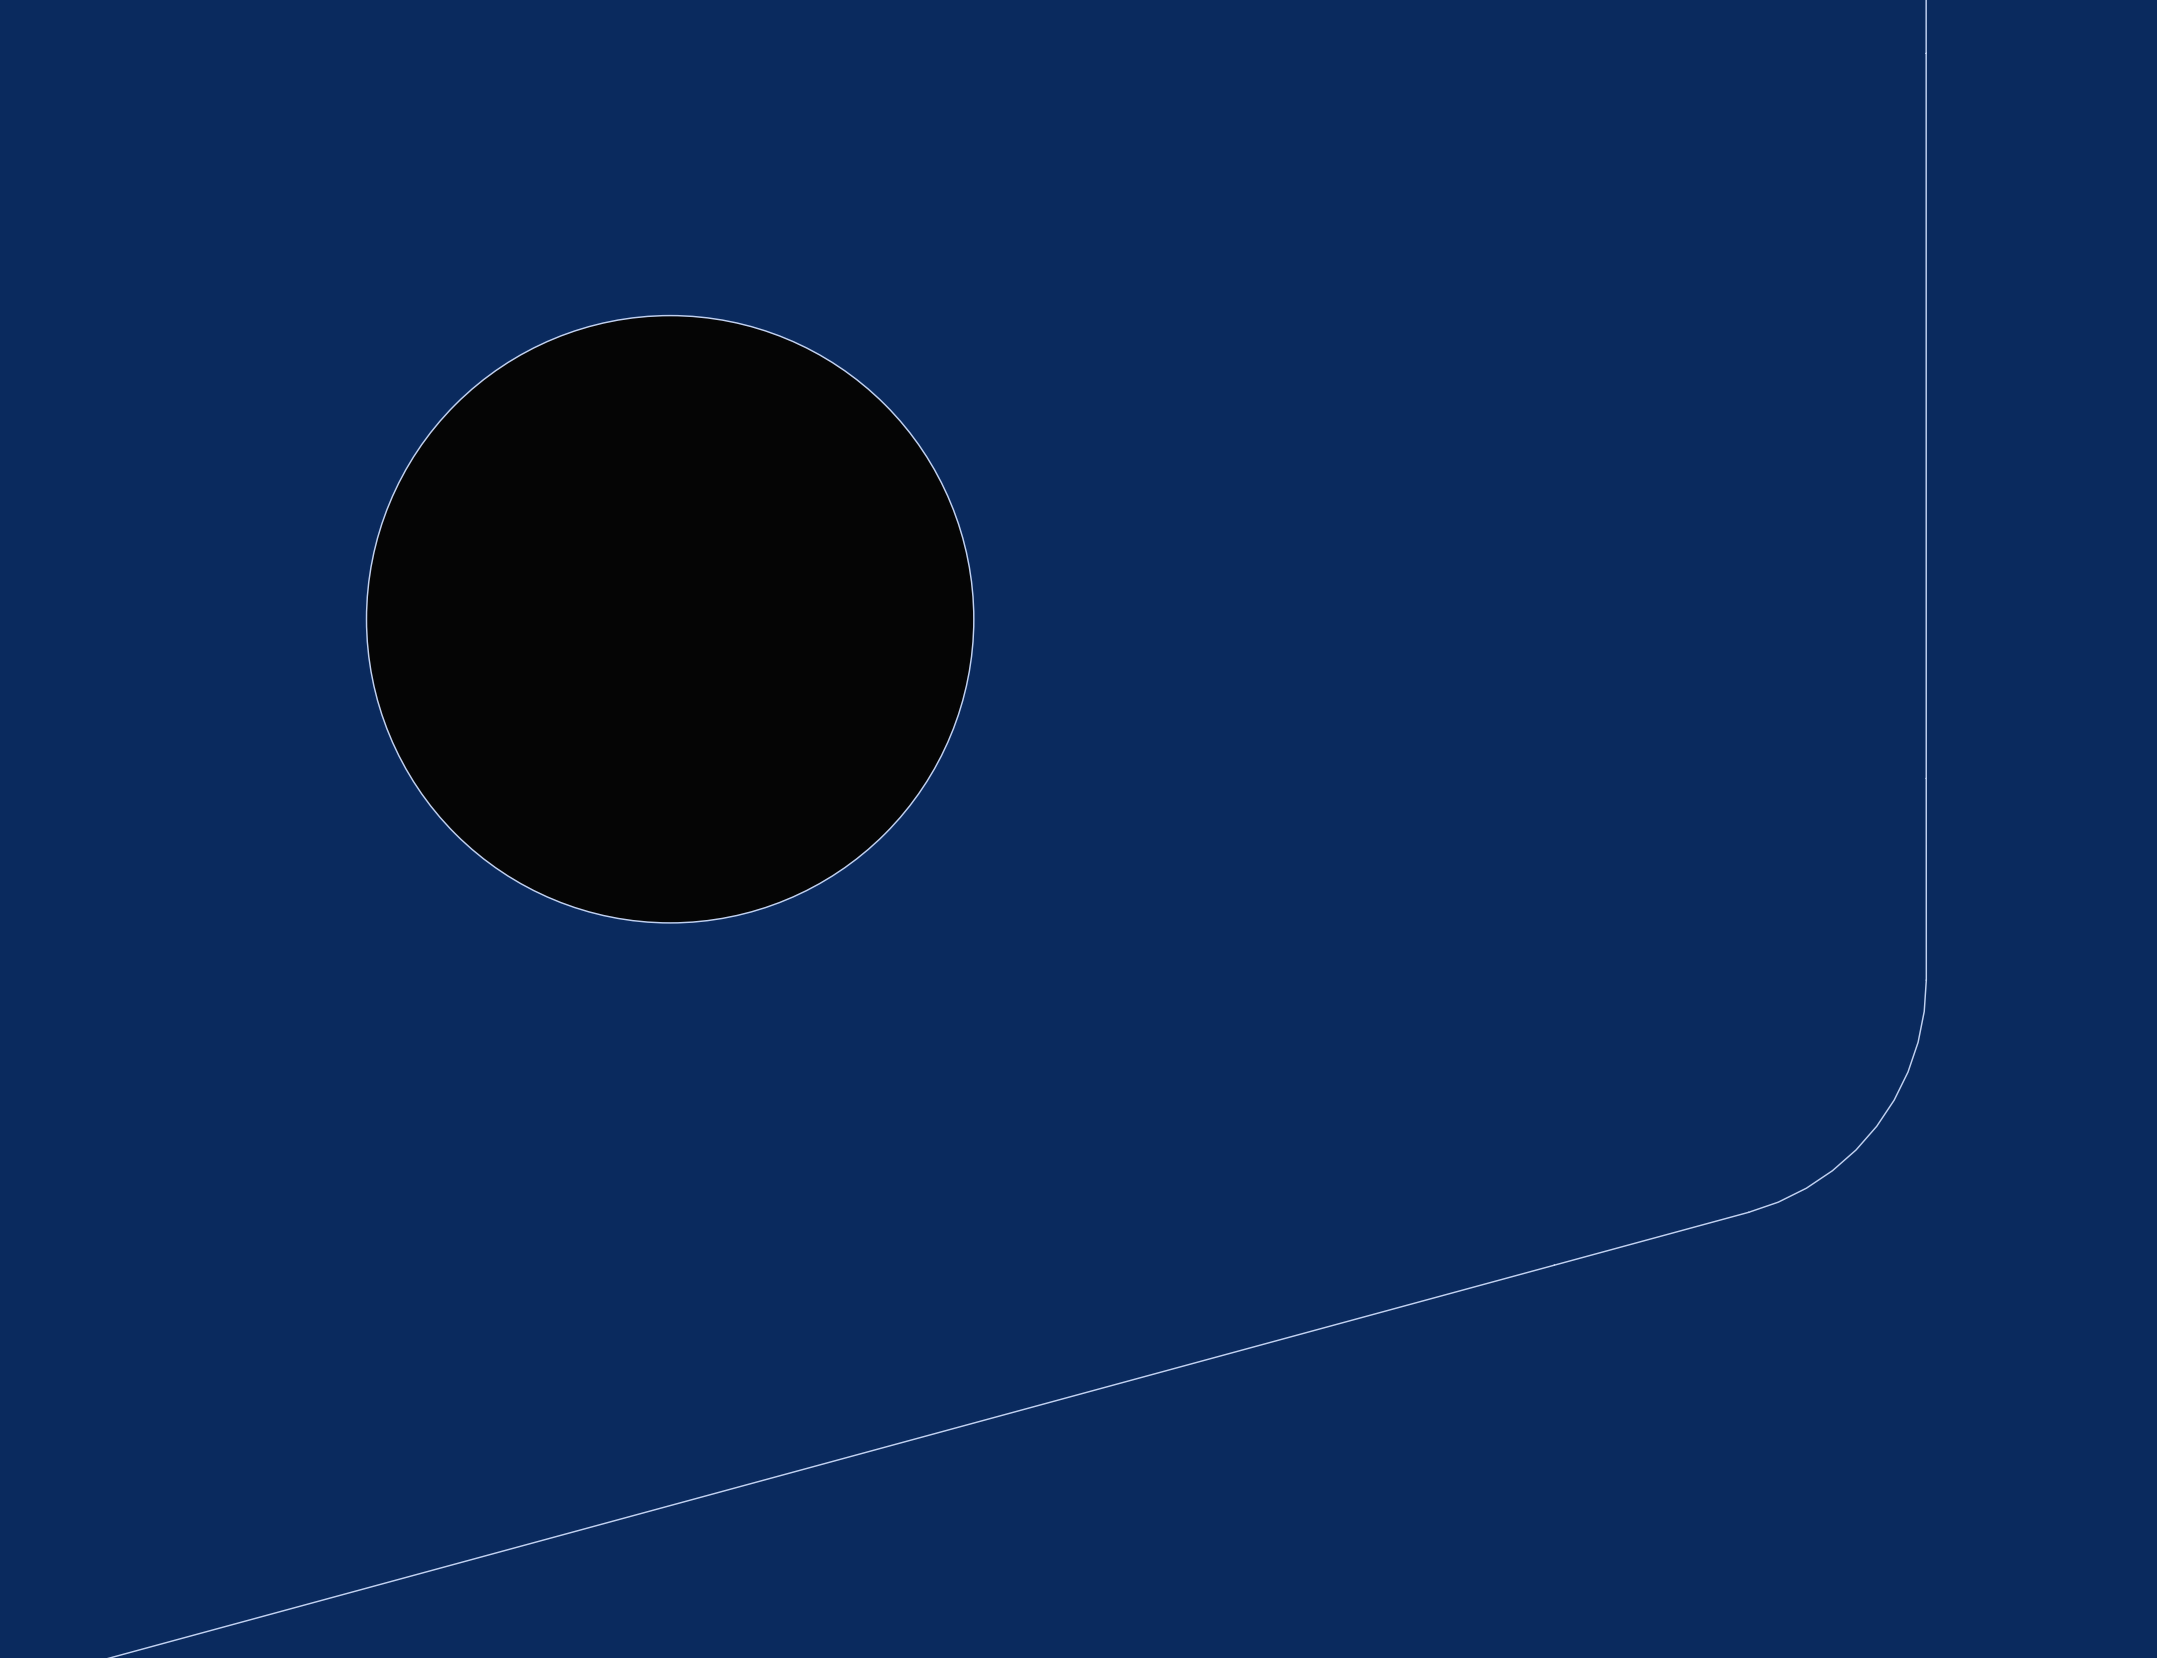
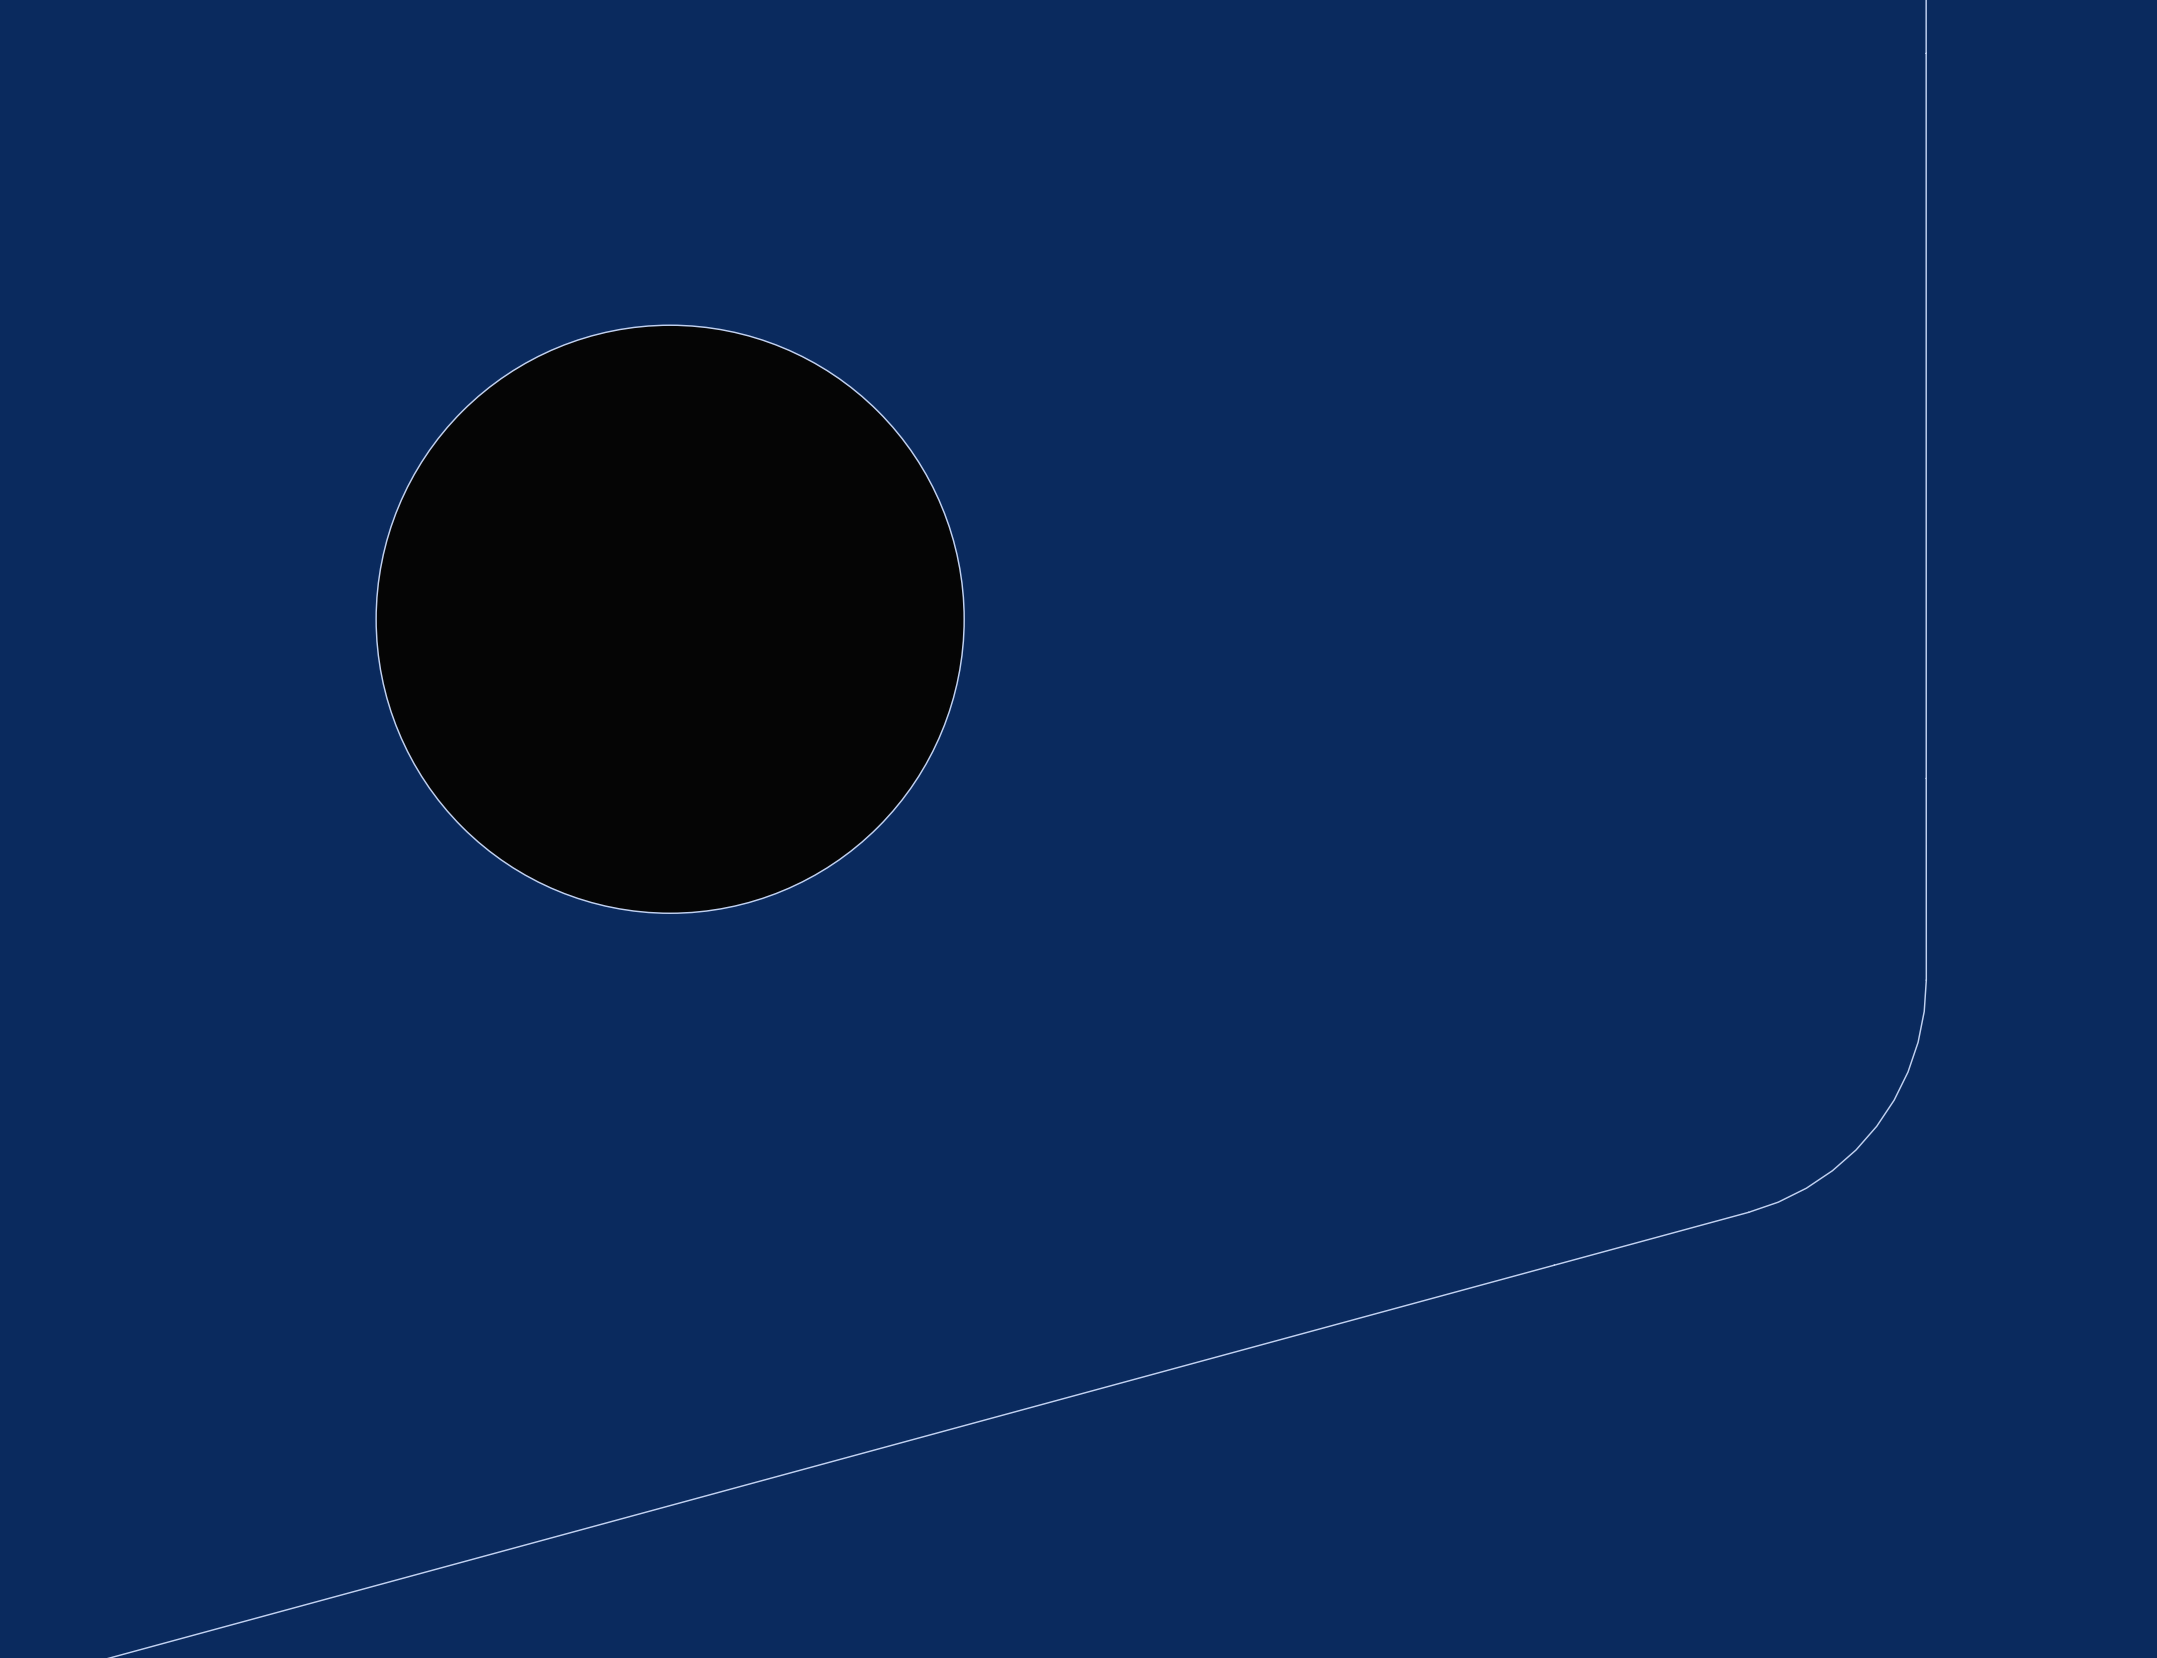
hole size: [366, 315, 974, 923] -> [376, 325, 965, 914]

